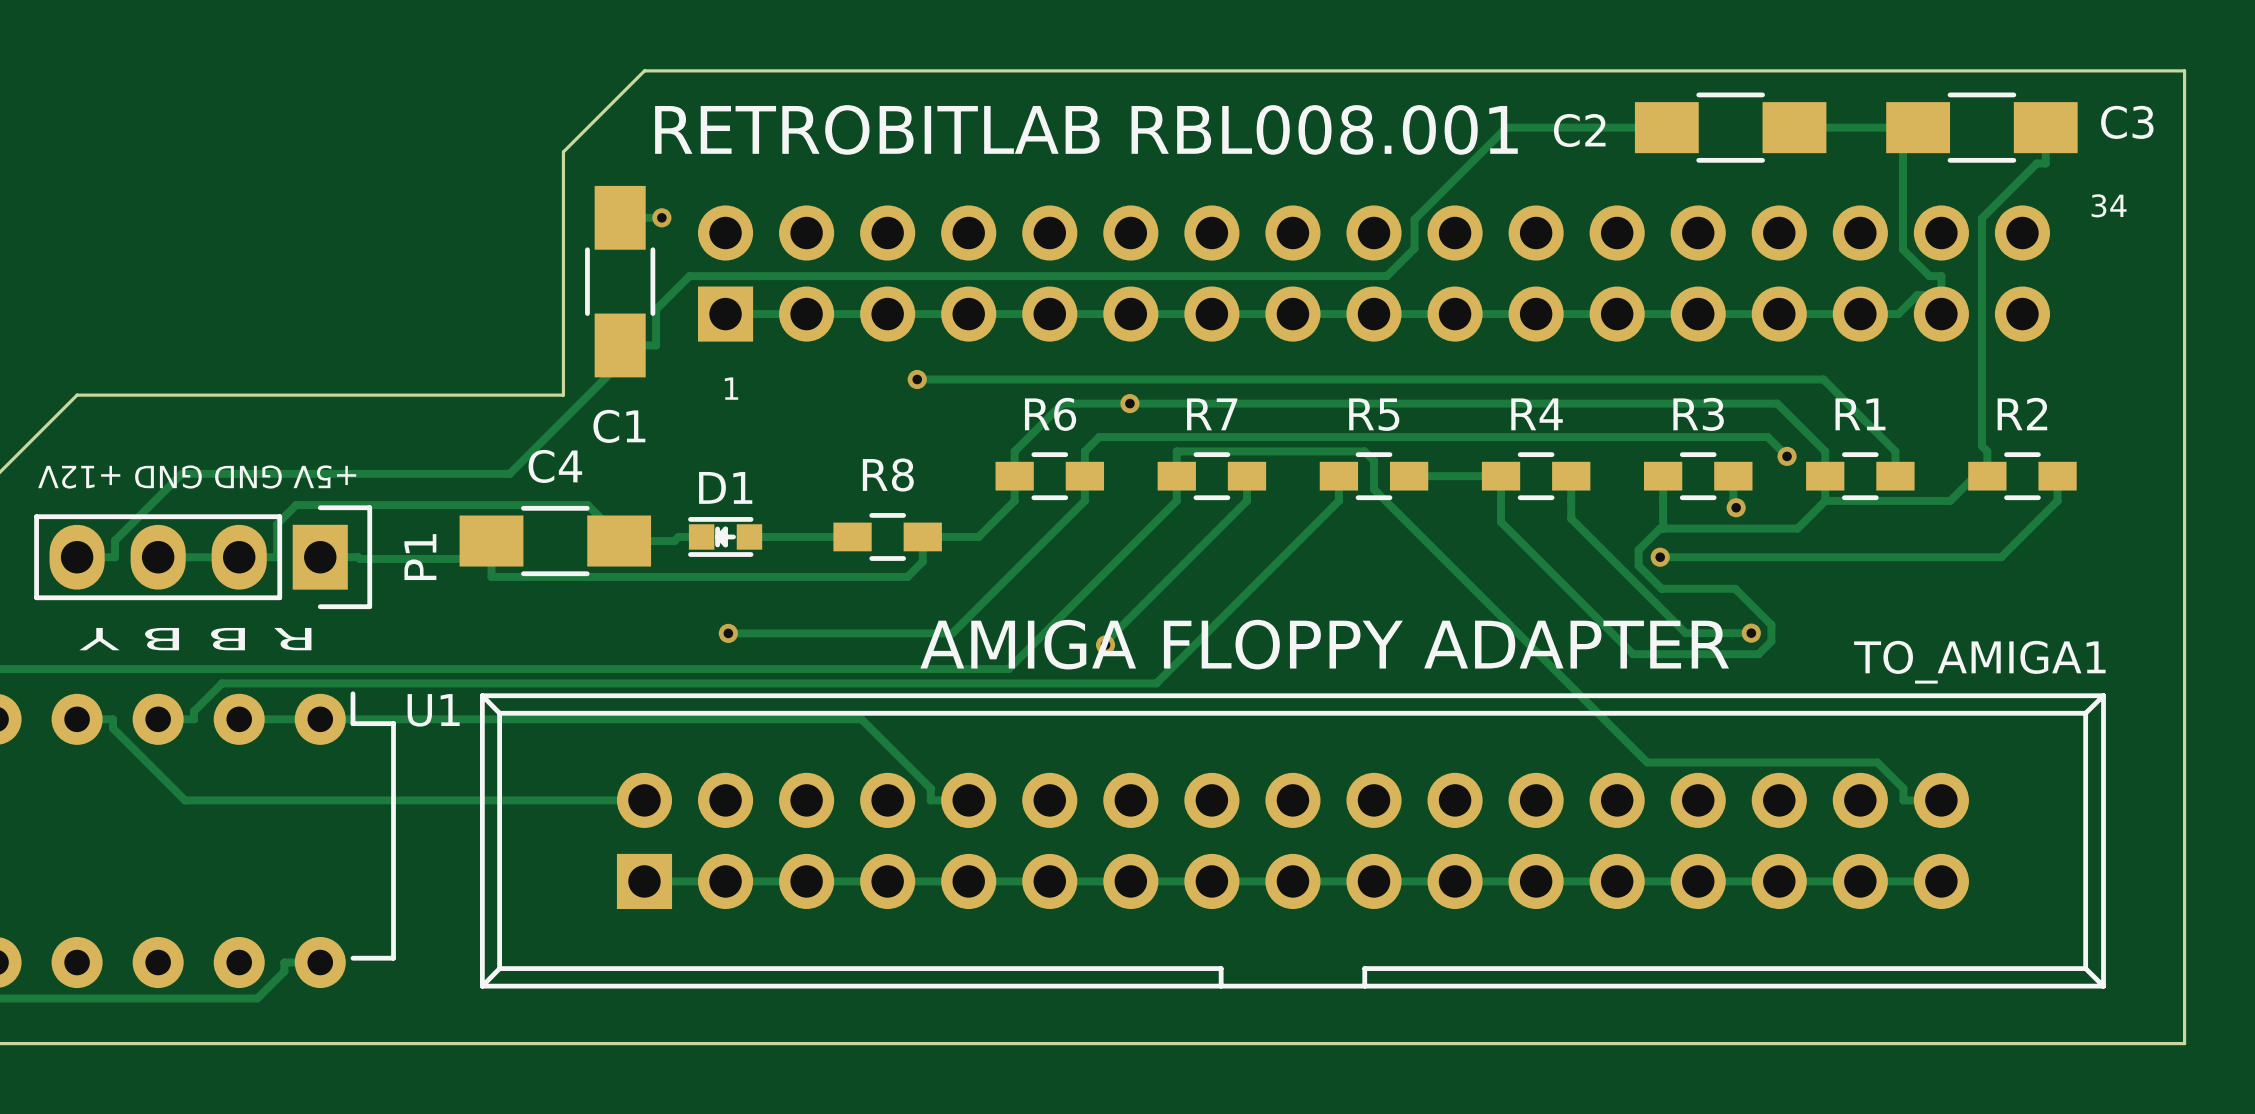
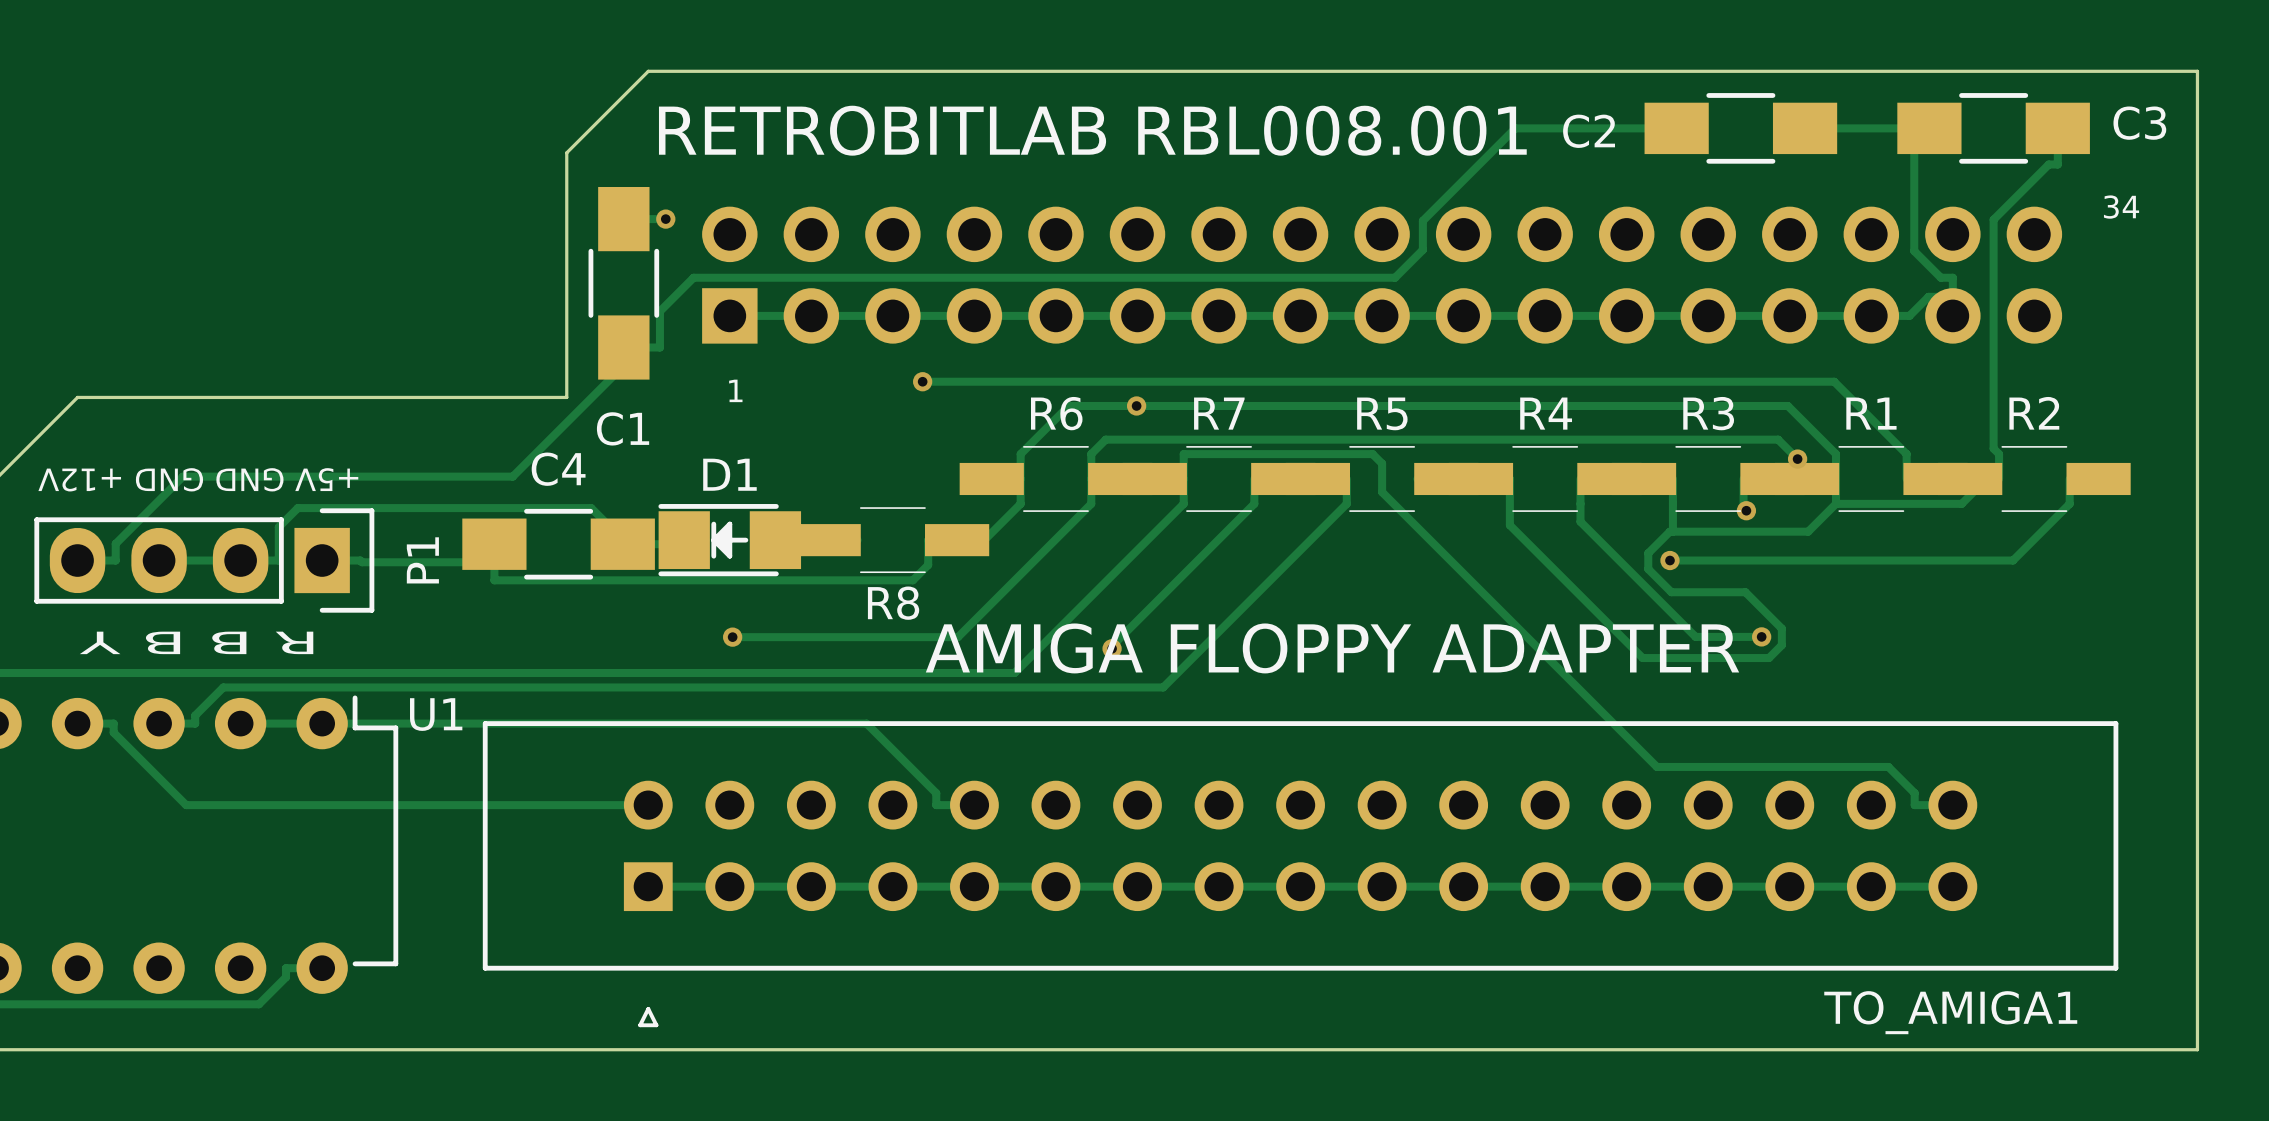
R6 footprint: [995, 452, 1105, 501] -> [959, 446, 1153, 512]
R7 footprint: [1157, 452, 1267, 501] -> [1122, 446, 1316, 512]
R5 footprint: [1319, 452, 1429, 501] -> [1285, 446, 1479, 512]
R4 footprint: [1481, 452, 1591, 501] -> [1448, 446, 1642, 512]
R3 footprint: [1643, 452, 1753, 501] -> [1611, 446, 1805, 512]
R1 footprint: [1806, 452, 1915, 501] -> [1775, 446, 1968, 512]
R2 footprint: [1968, 452, 2077, 501] -> [1938, 446, 2131, 512]
R8 name position: R8 (888, 475) -> R8 (893, 603)
R8 footprint: [833, 513, 942, 561] -> [796, 508, 990, 573]
D1 footprint: [688, 517, 763, 557] -> [658, 504, 802, 577]
TO_AMIGA1 name position: TO_AMIGA1 (1979, 662) -> TO_AMIGA1 (1950, 1012)
TO_AMIGA1 footprint: [479, 693, 2106, 989] -> [482, 721, 2119, 1028]

